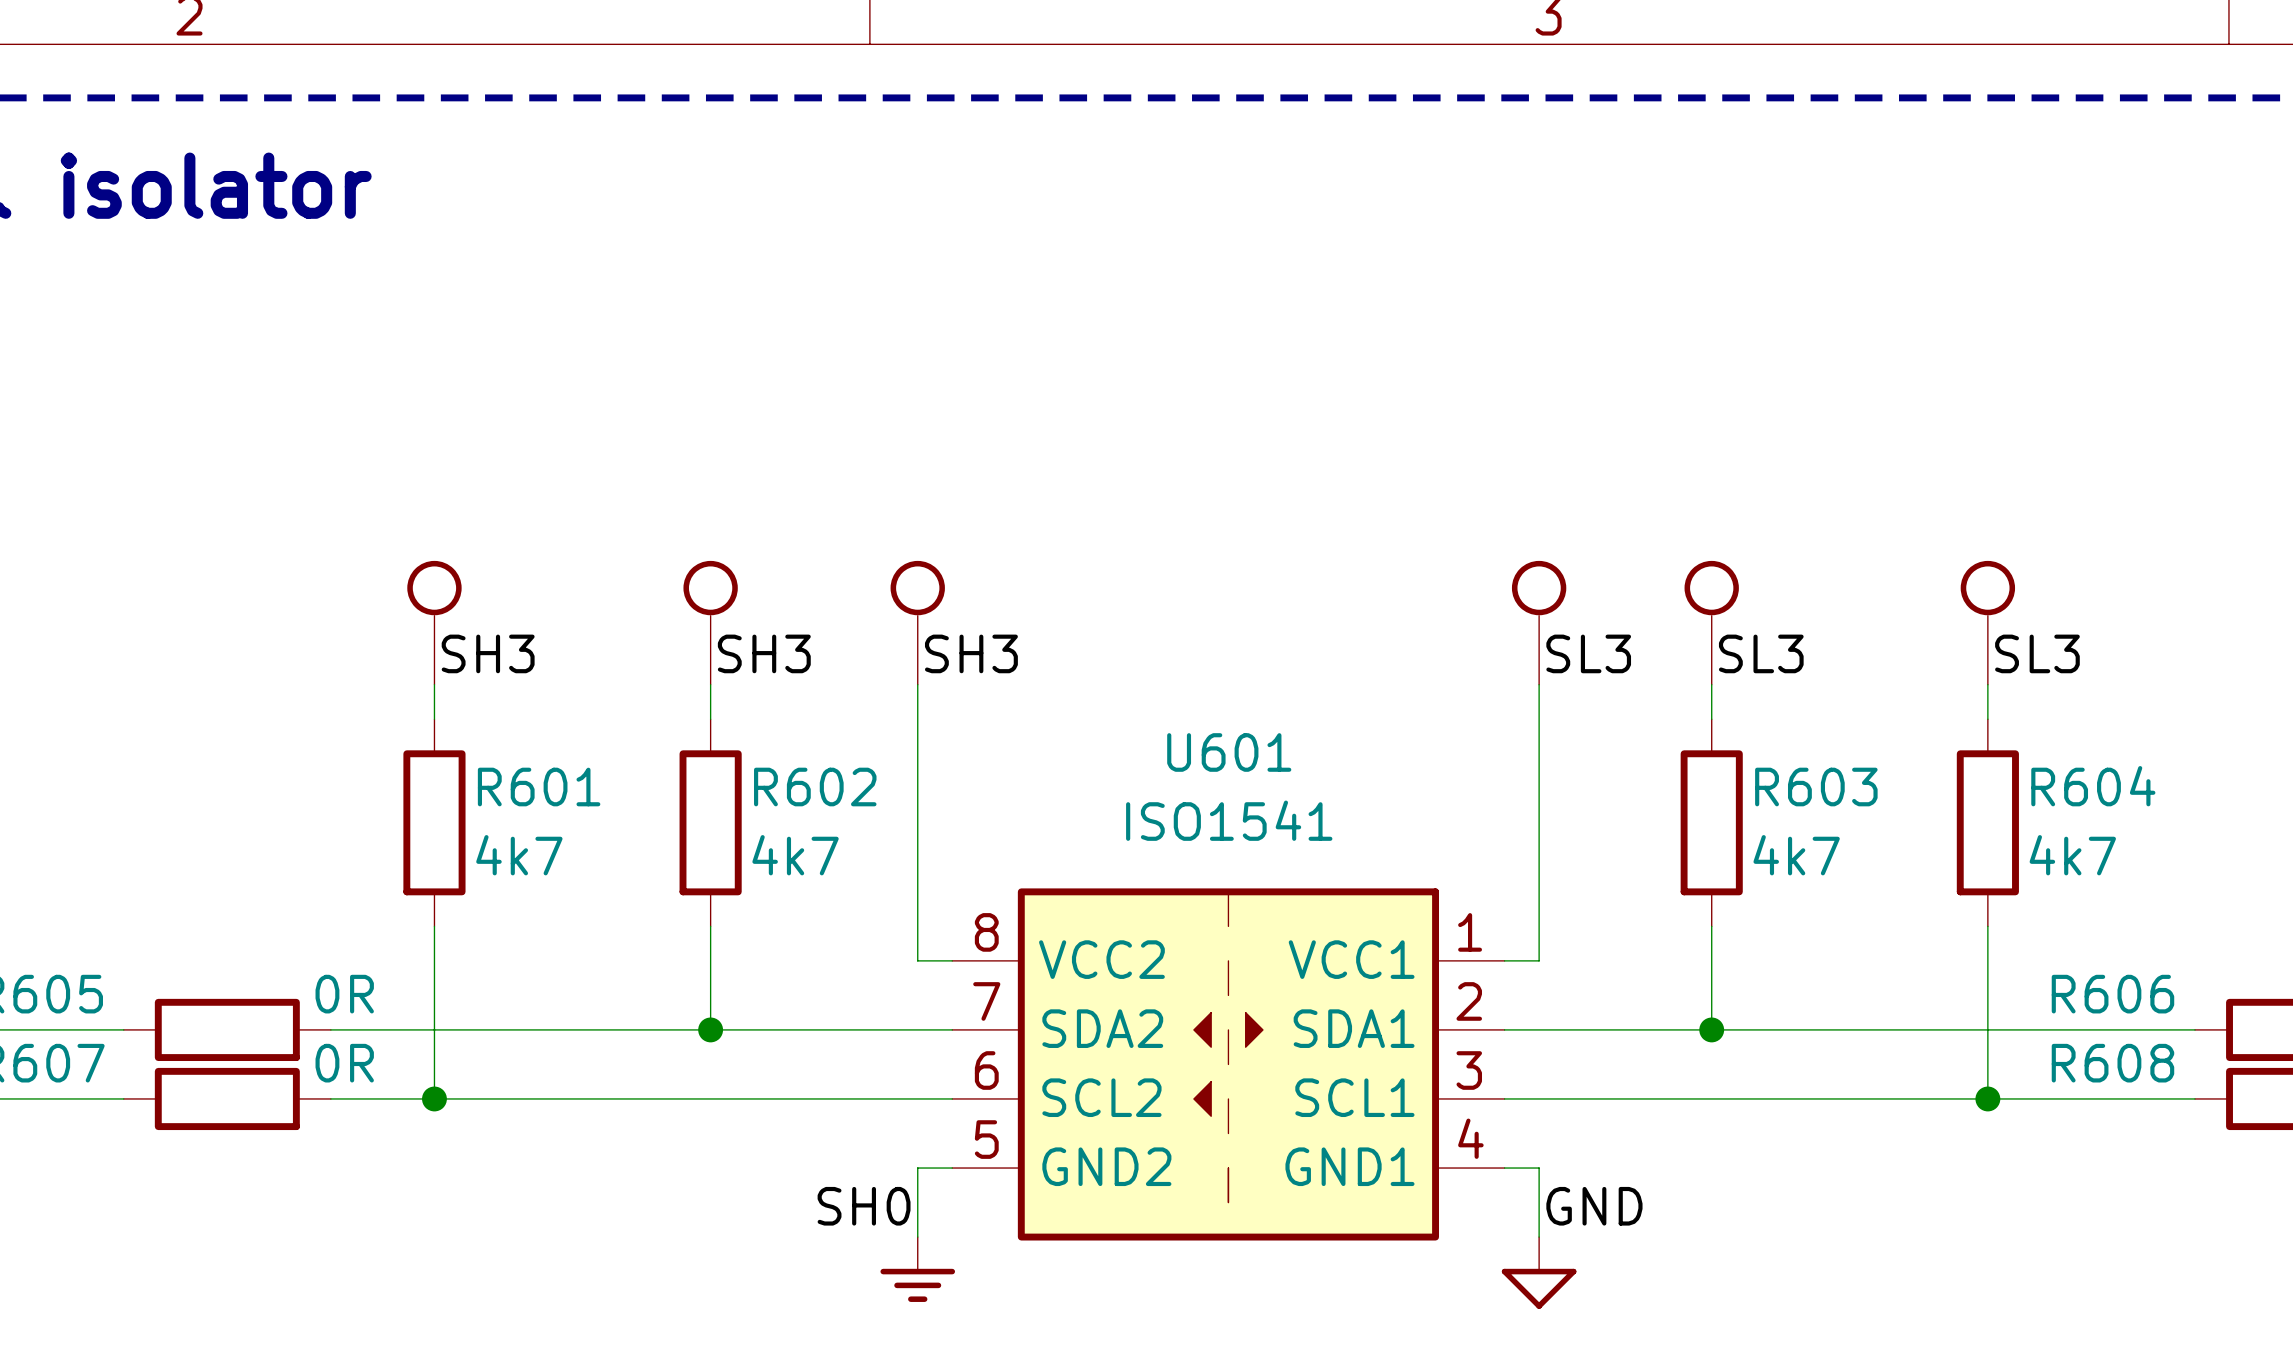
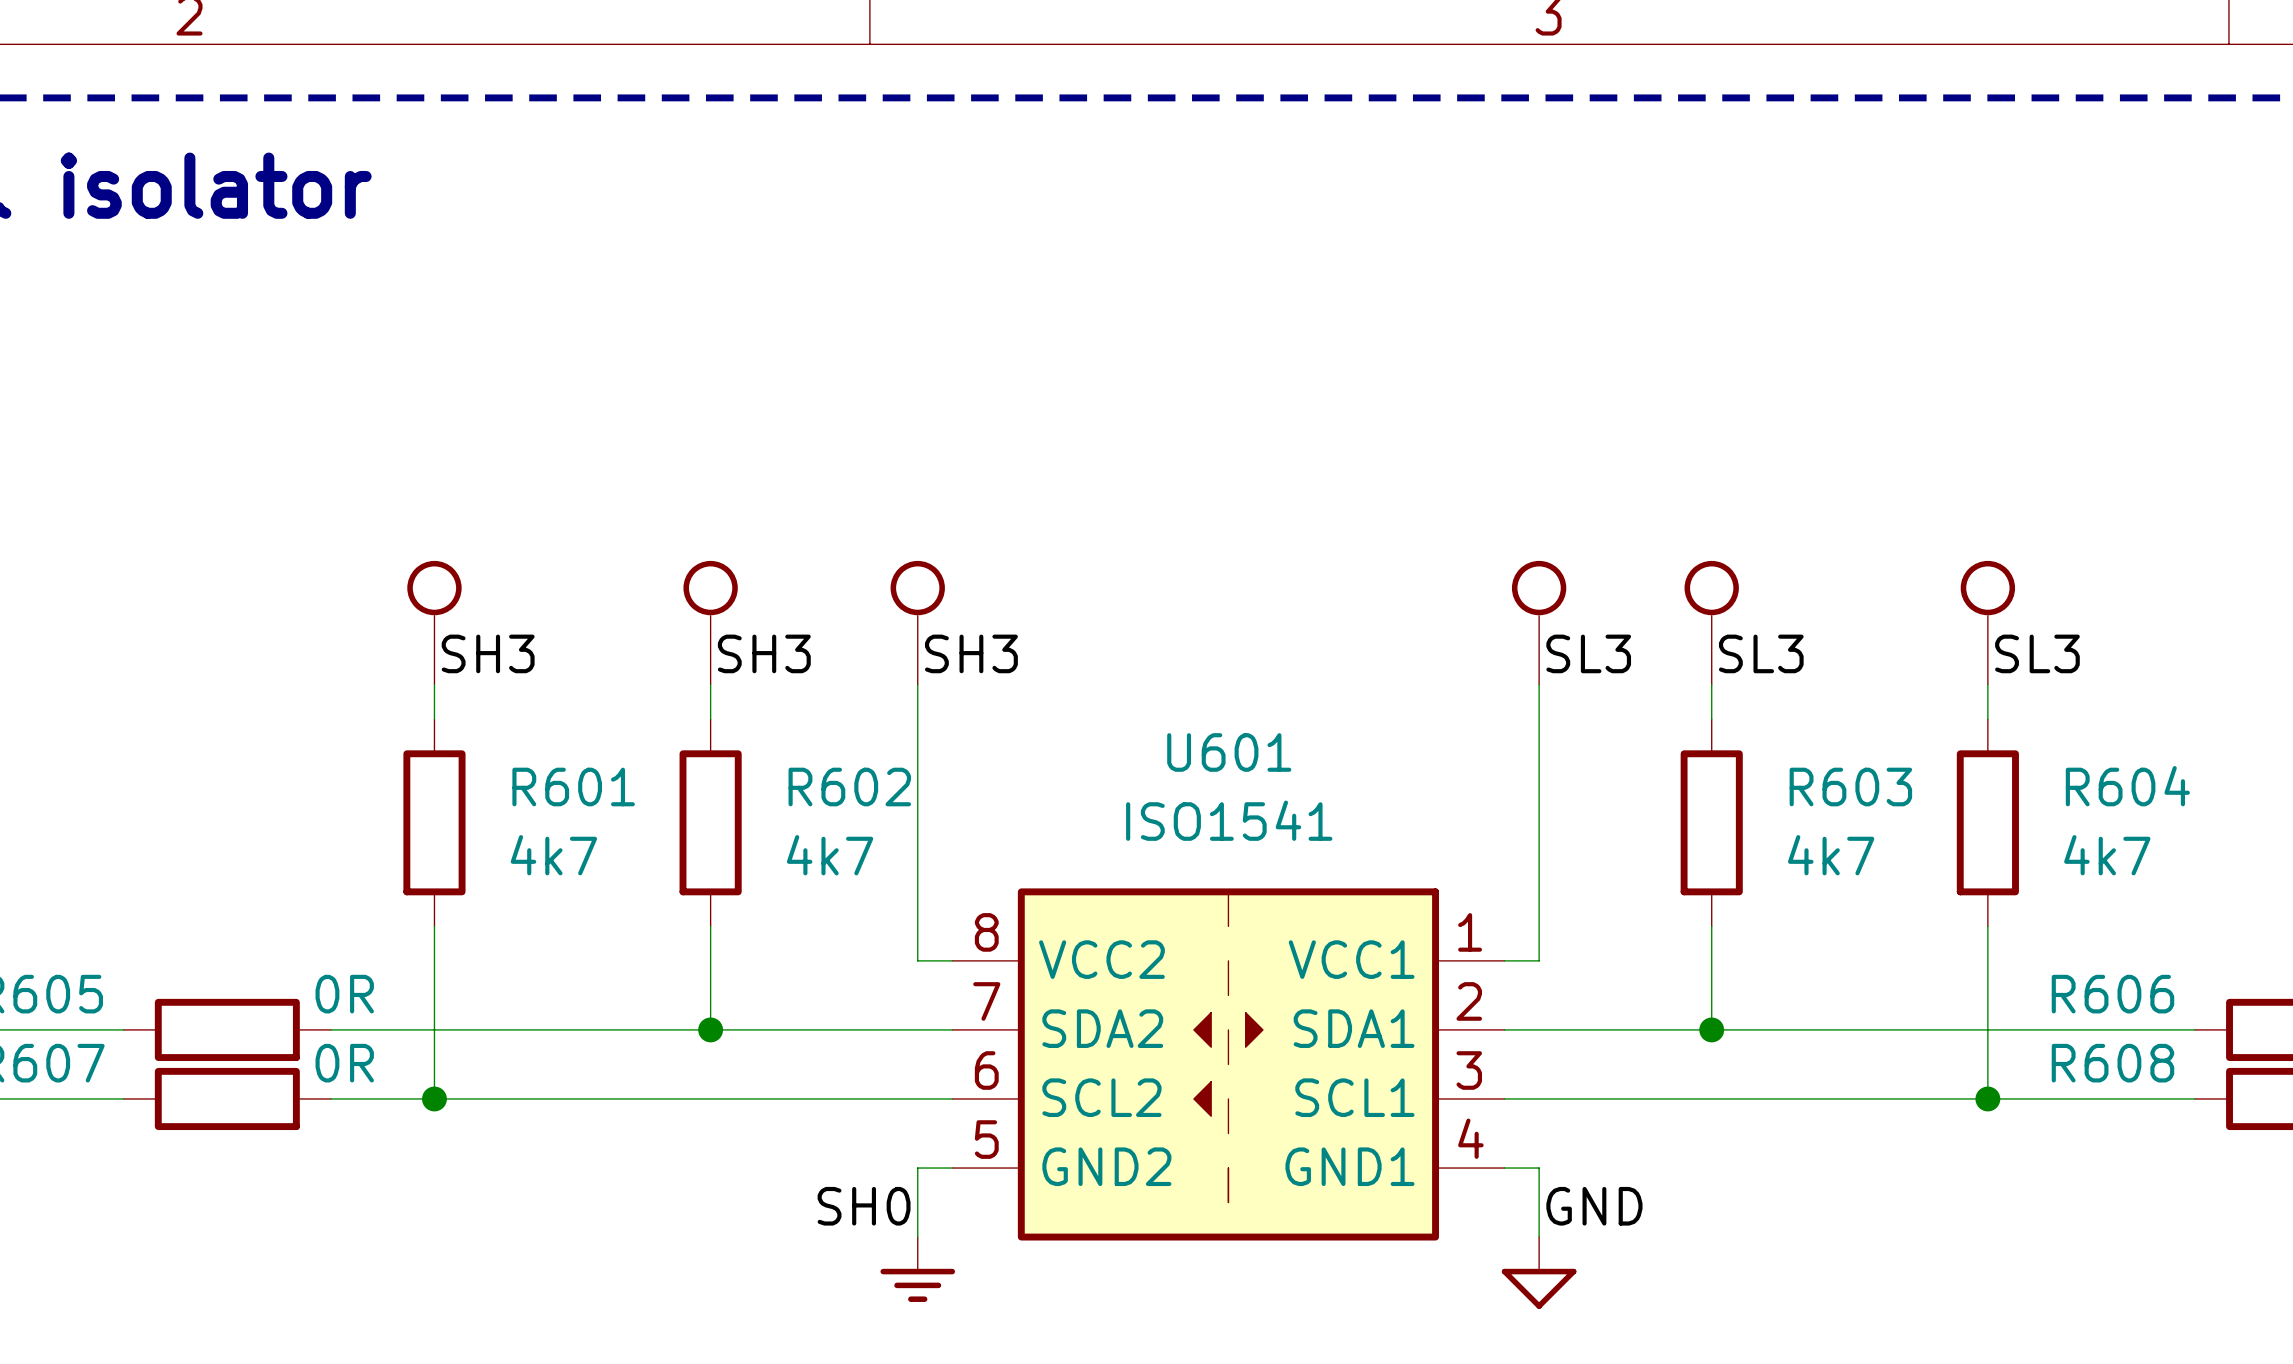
R604 name position: R604 (2093, 786) -> R604 (2127, 786)
R601 name position: R601 (539, 787) -> R601 (573, 787)
R602 name position: R602 (815, 787) -> R602 (849, 787)
R603 name position: R603 (1816, 787) -> R603 (1850, 787)
R601 value position: 4k7 (519, 855) -> 4k7 (553, 855)
R602 value position: 4k7 (795, 855) -> 4k7 (830, 855)
R603 value position: 4k7 (1796, 855) -> 4k7 (1831, 855)
R604 value position: 4k7 (2072, 855) -> 4k7 (2107, 855)

